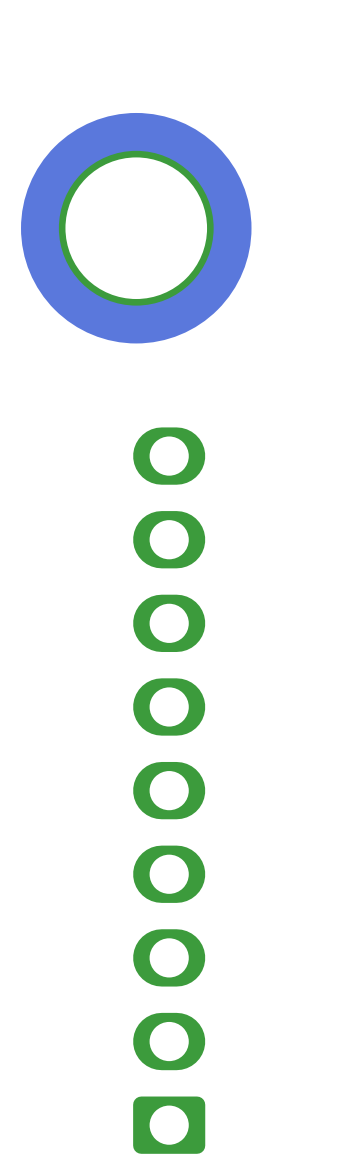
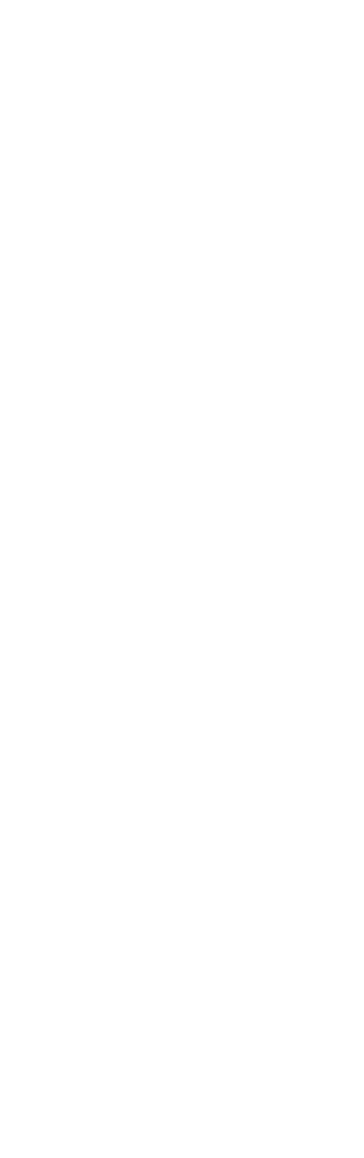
part: (136, 228) -> none
part: (169, 790) -> none

